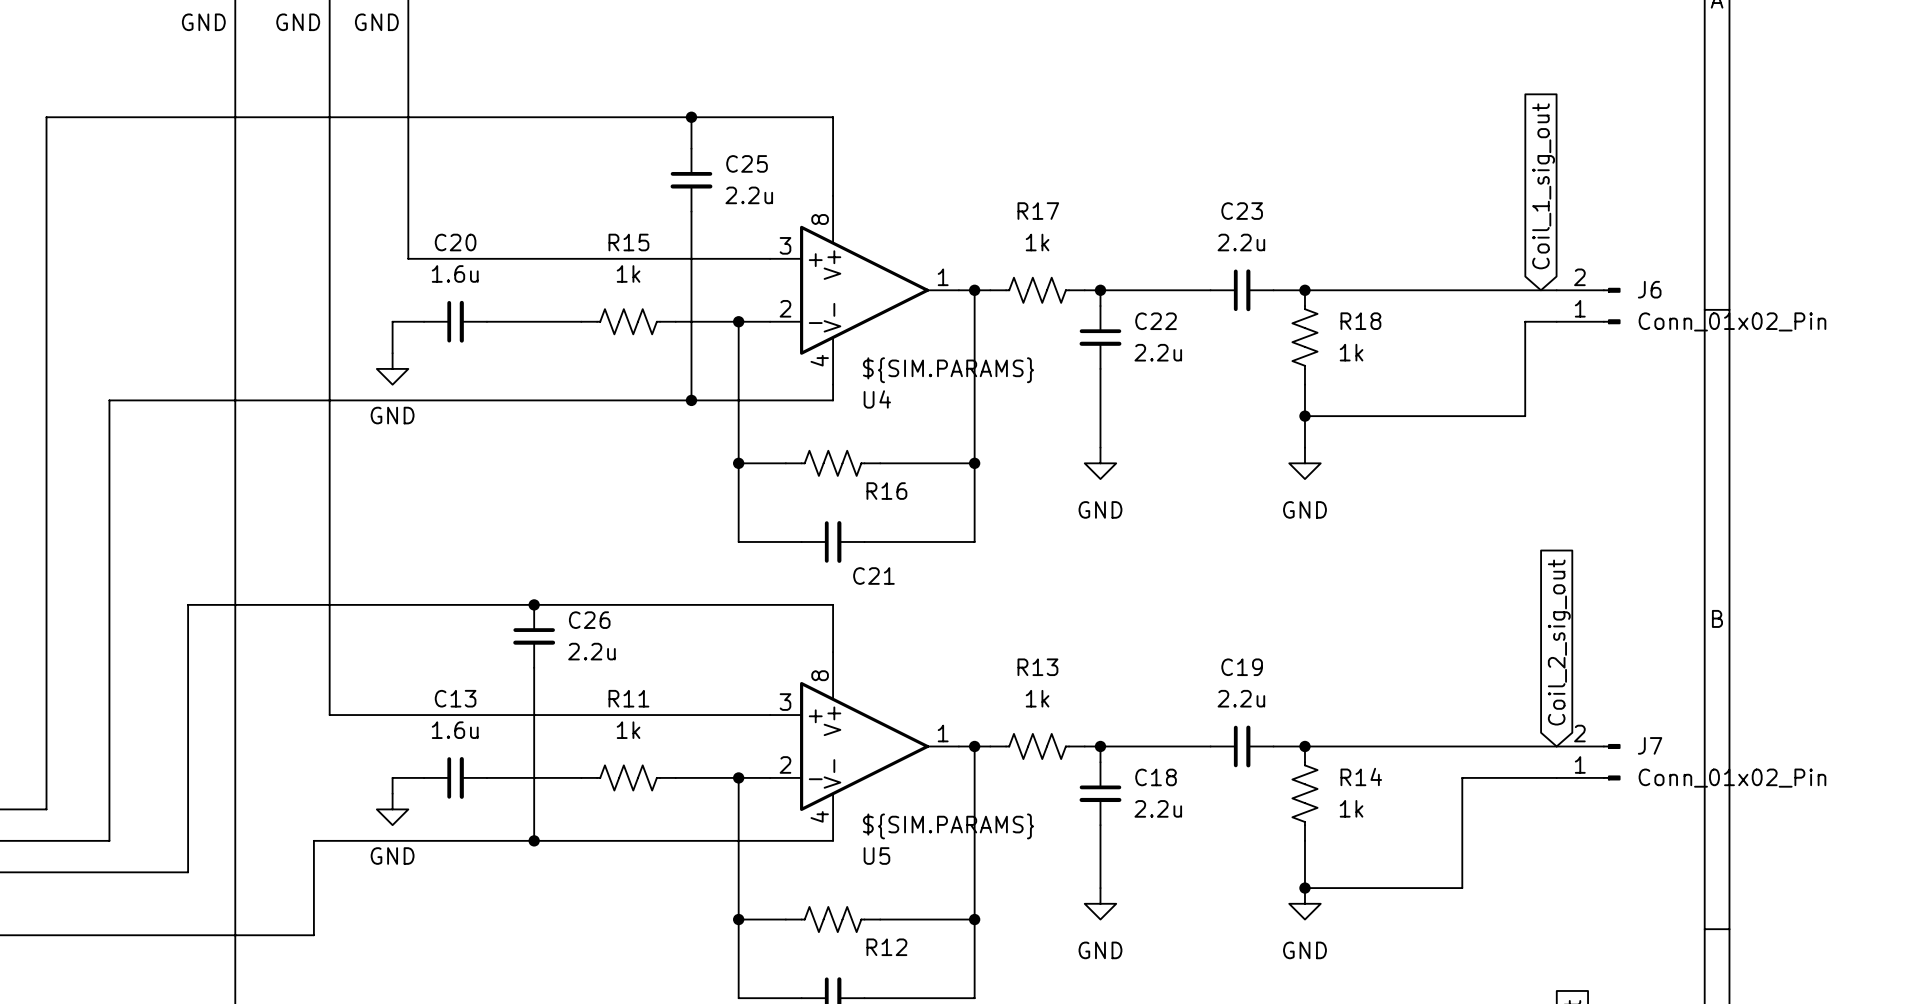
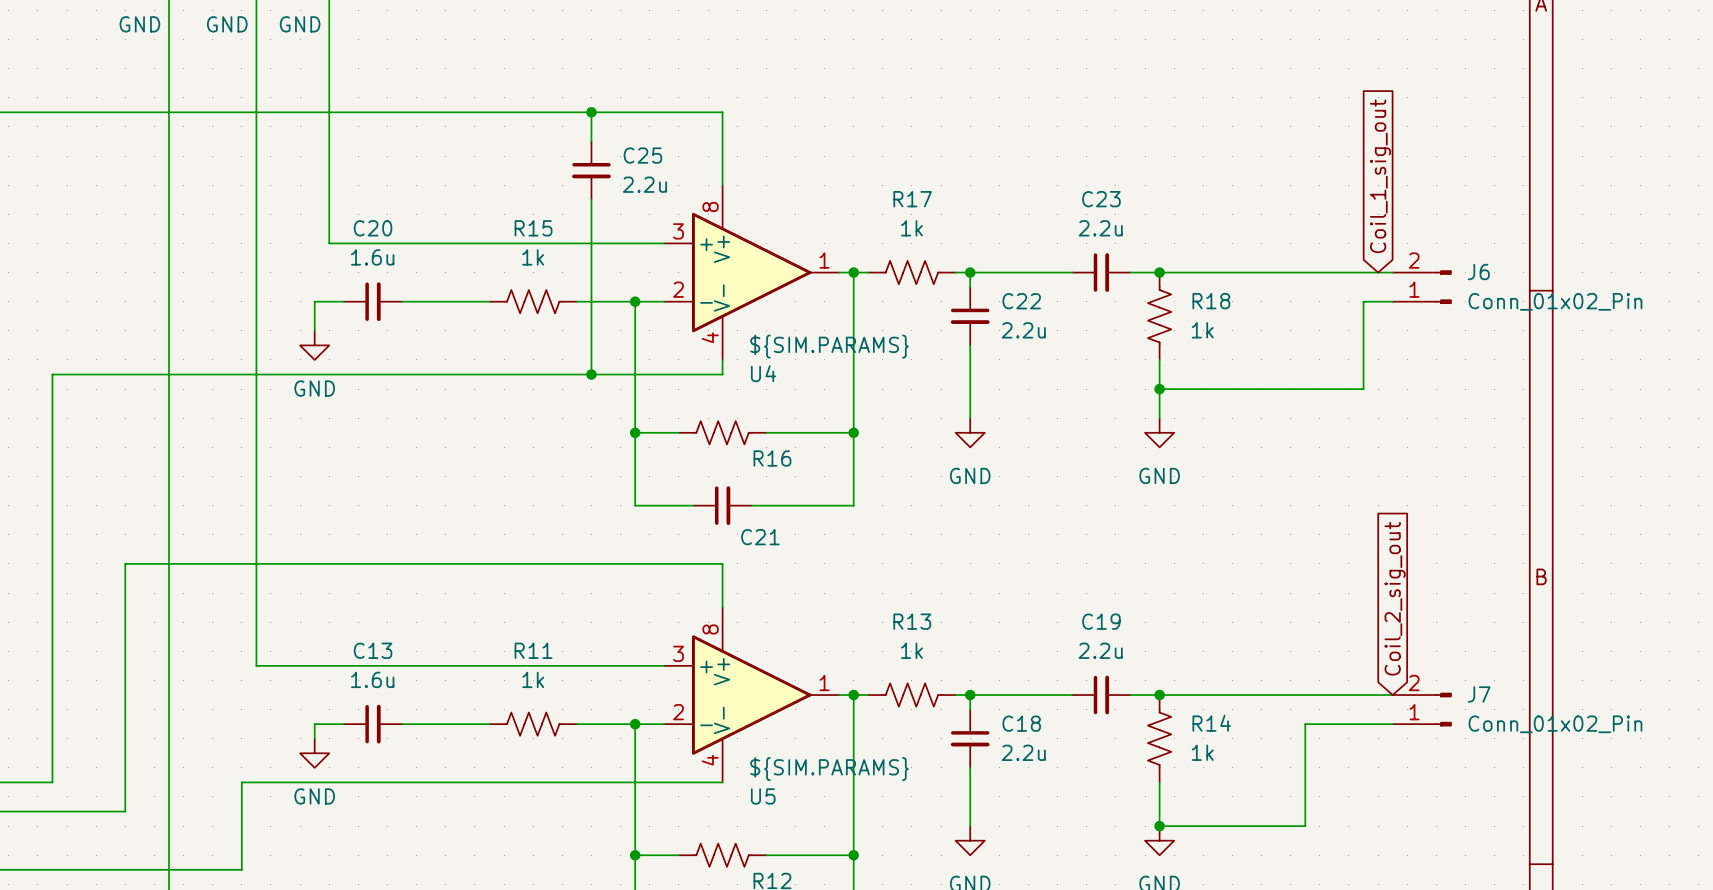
junction: (534, 604) -> none
C26: 2.2u (534, 636) -> none
wire: (534, 667) (534, 840) -> none
junction: (534, 840) -> none

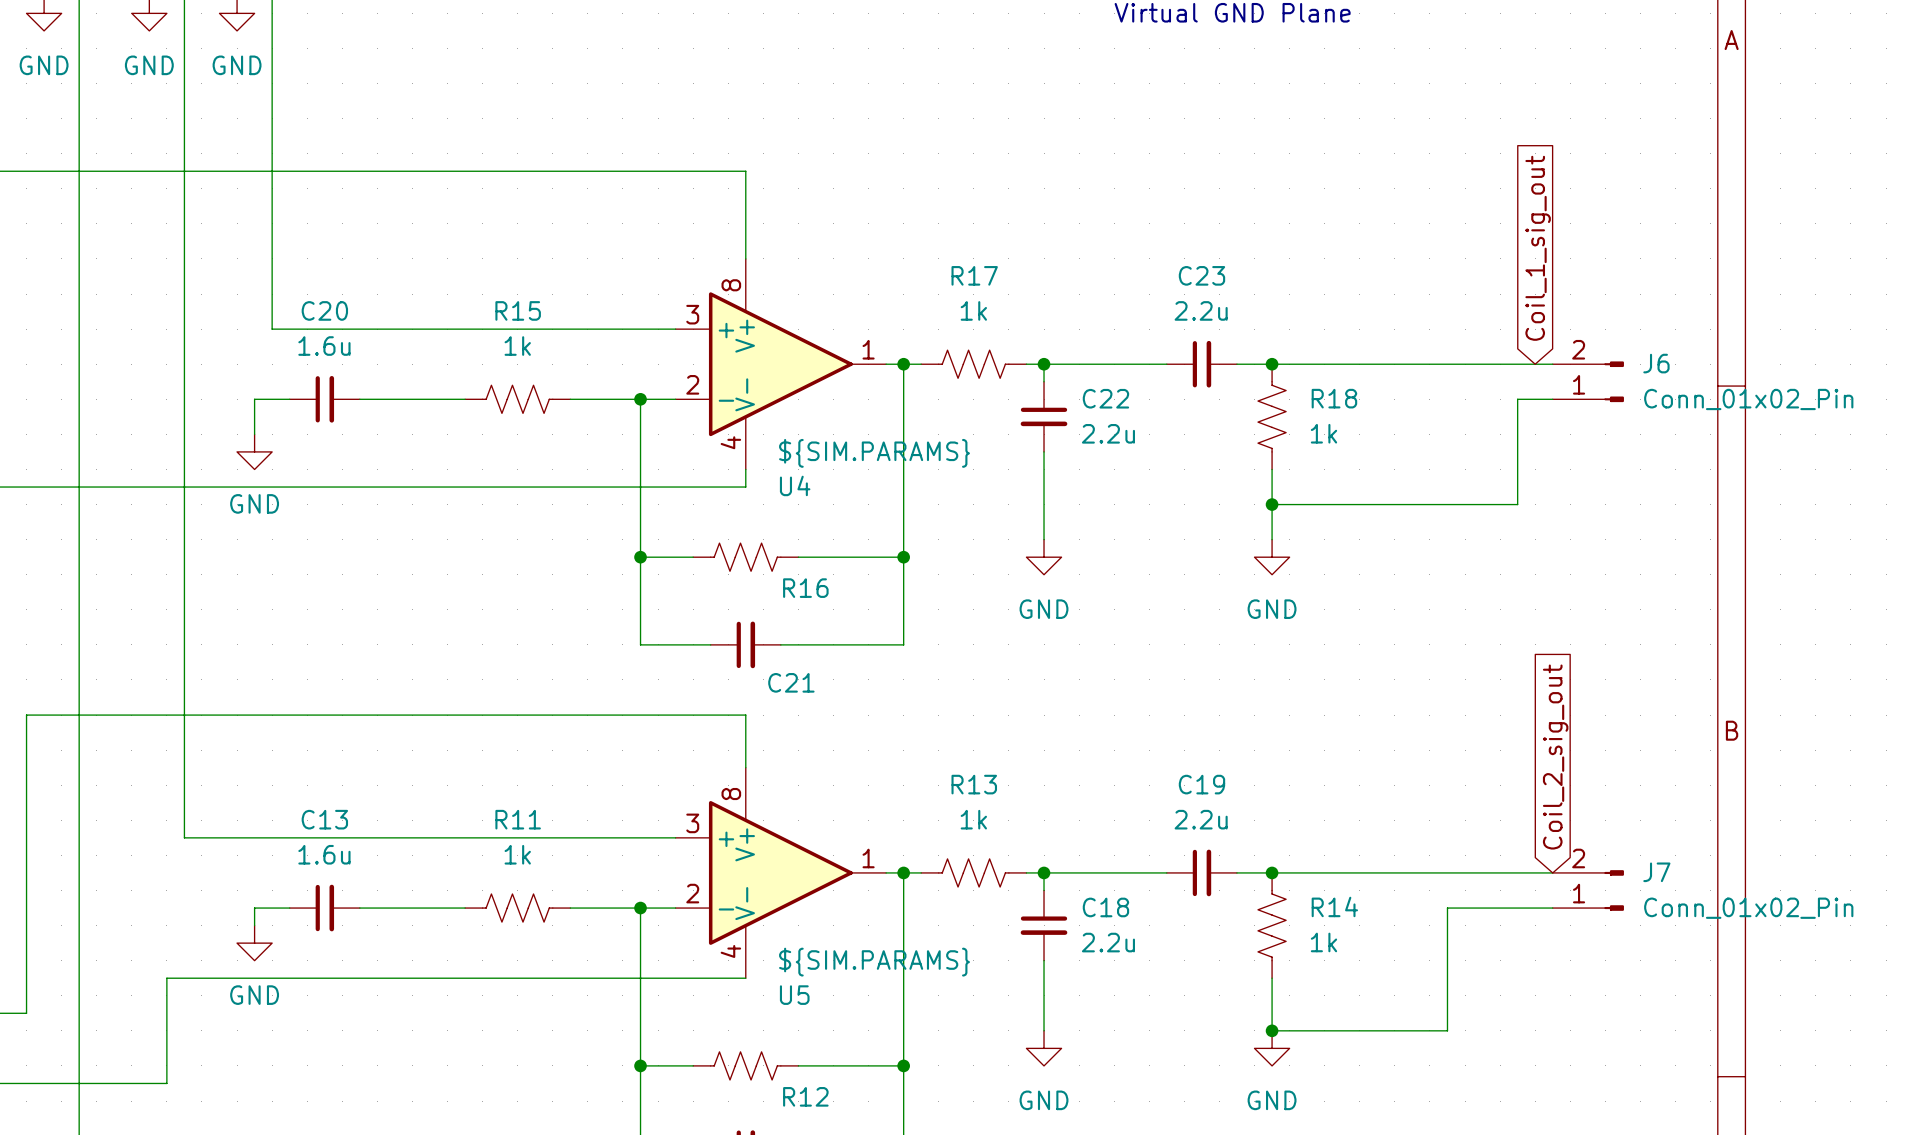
wire: (591, 112) (591, 141) -> none
junction: (591, 112) -> none
C25: 2.2u (591, 170) -> none
wire: (591, 199) (591, 374) -> none
junction: (591, 374) -> none

